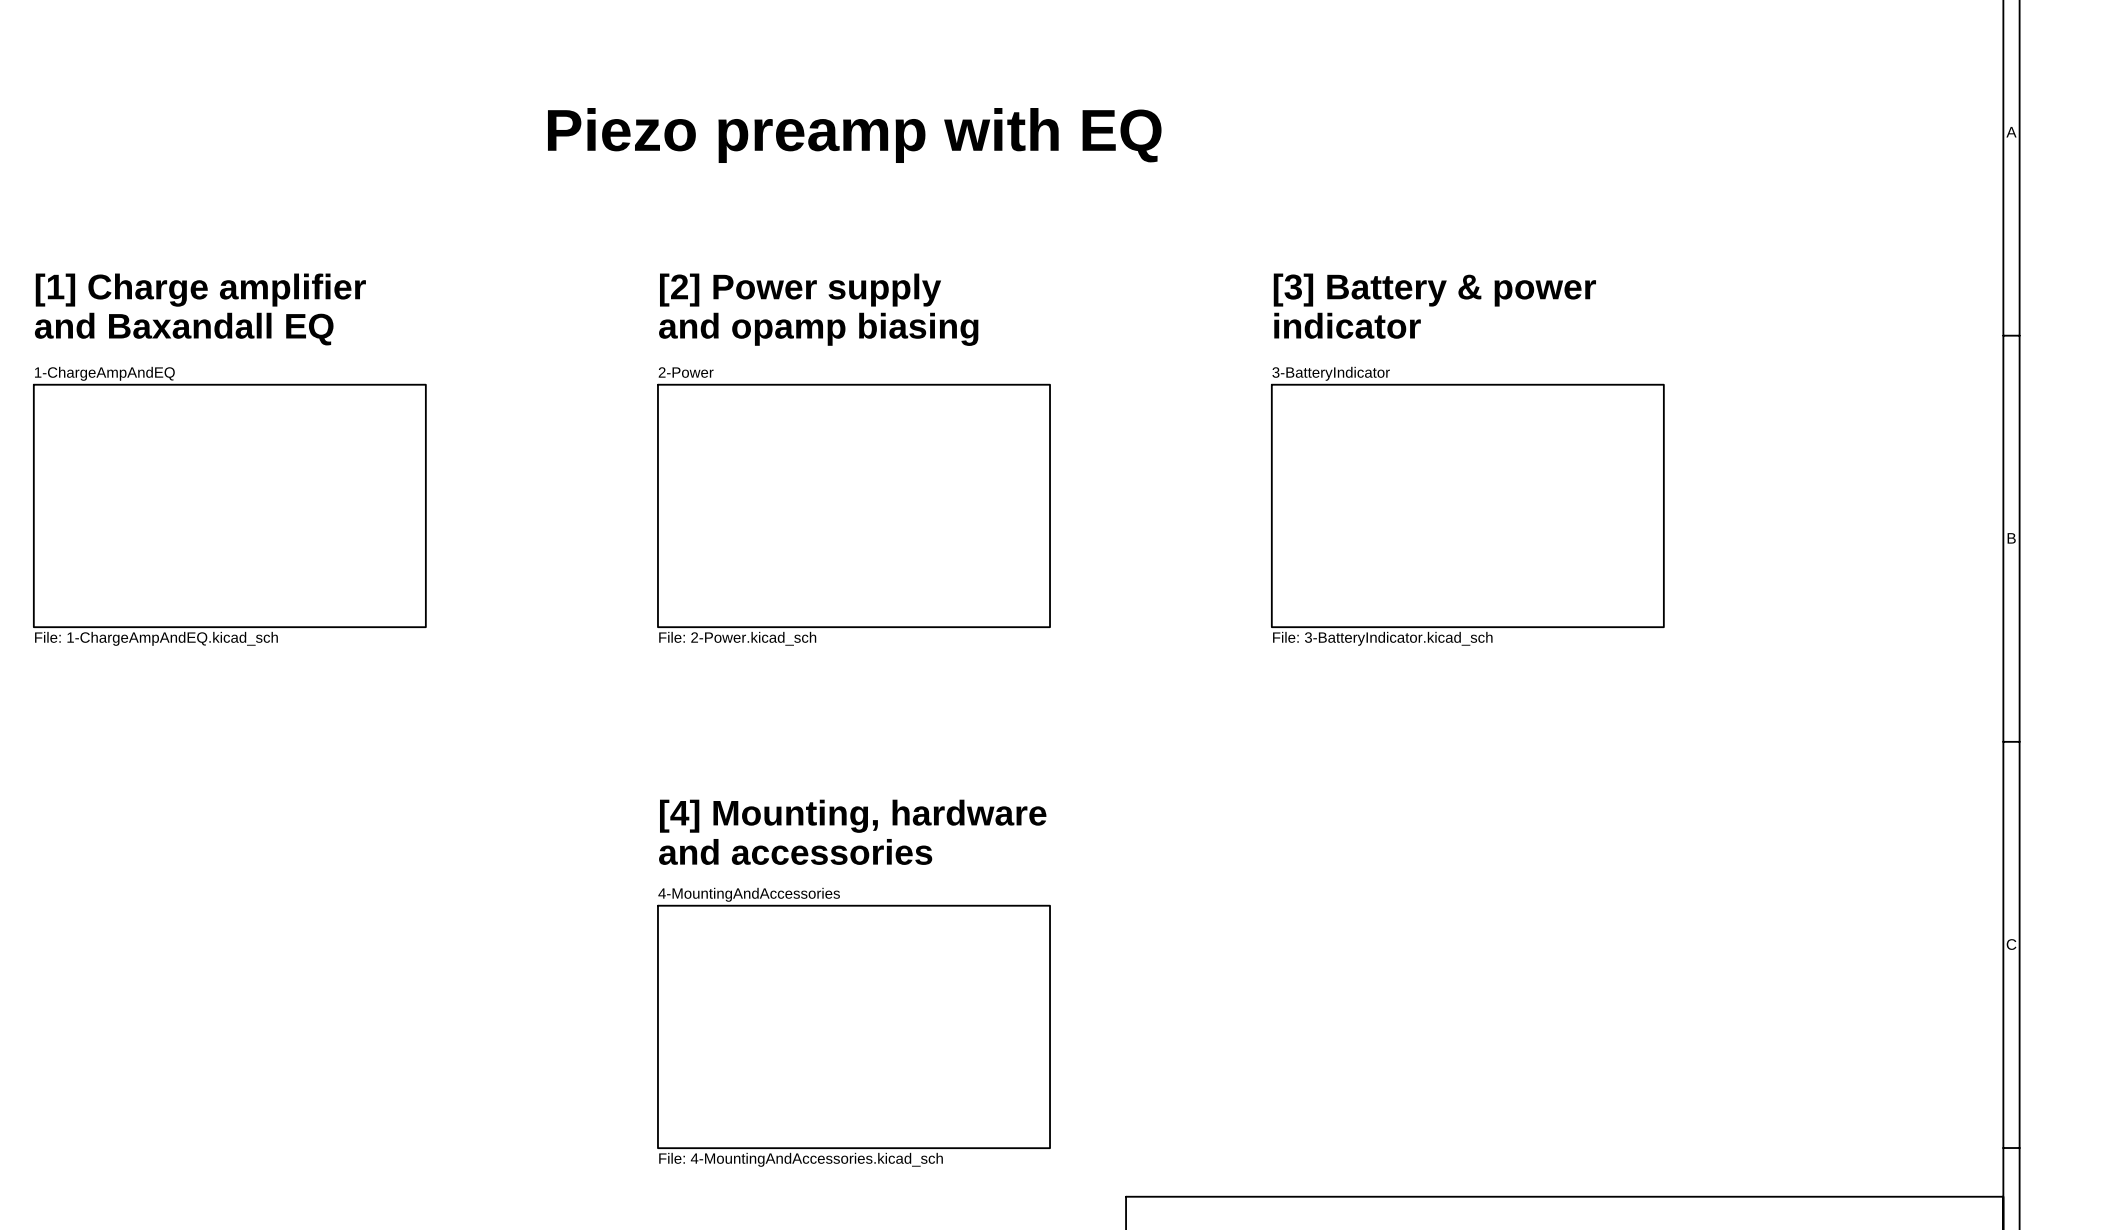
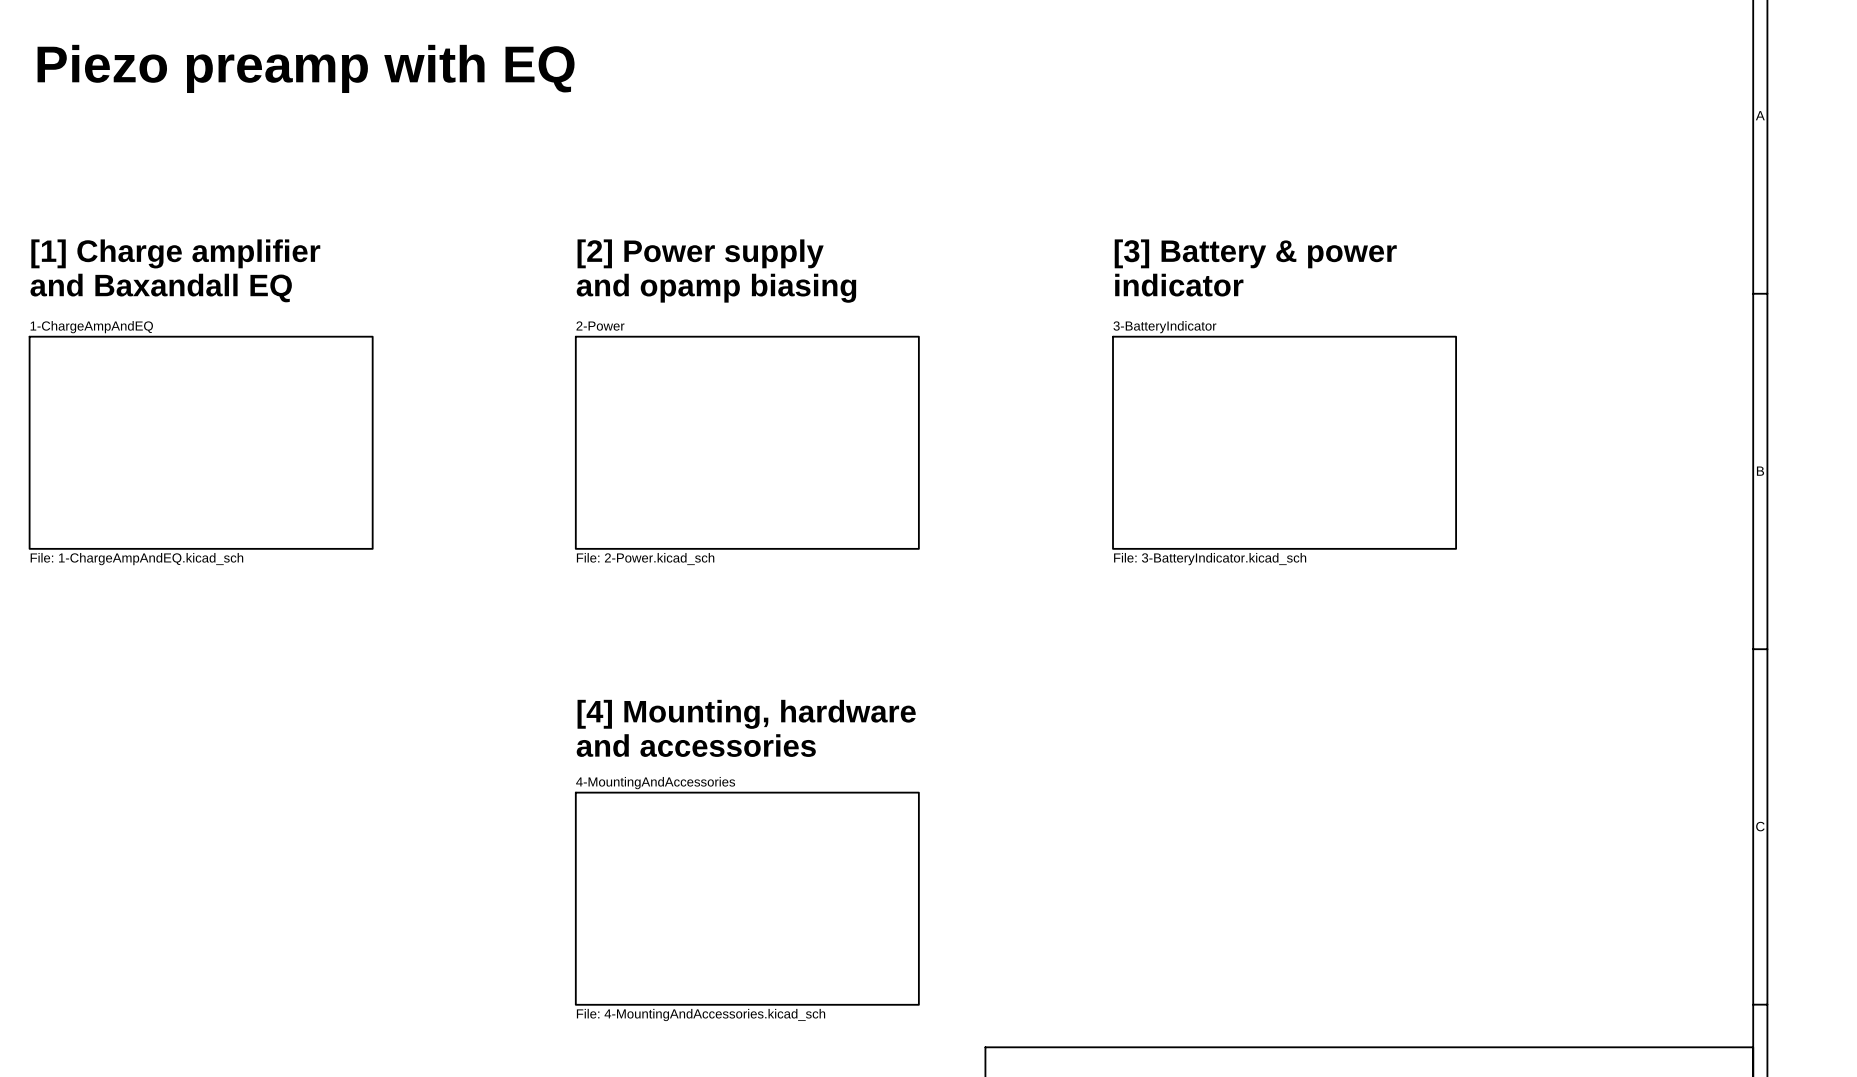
text: none -> Piezo preamp with EQ (306, 68)
text: Piezo preamp with EQ (854, 135) -> none

